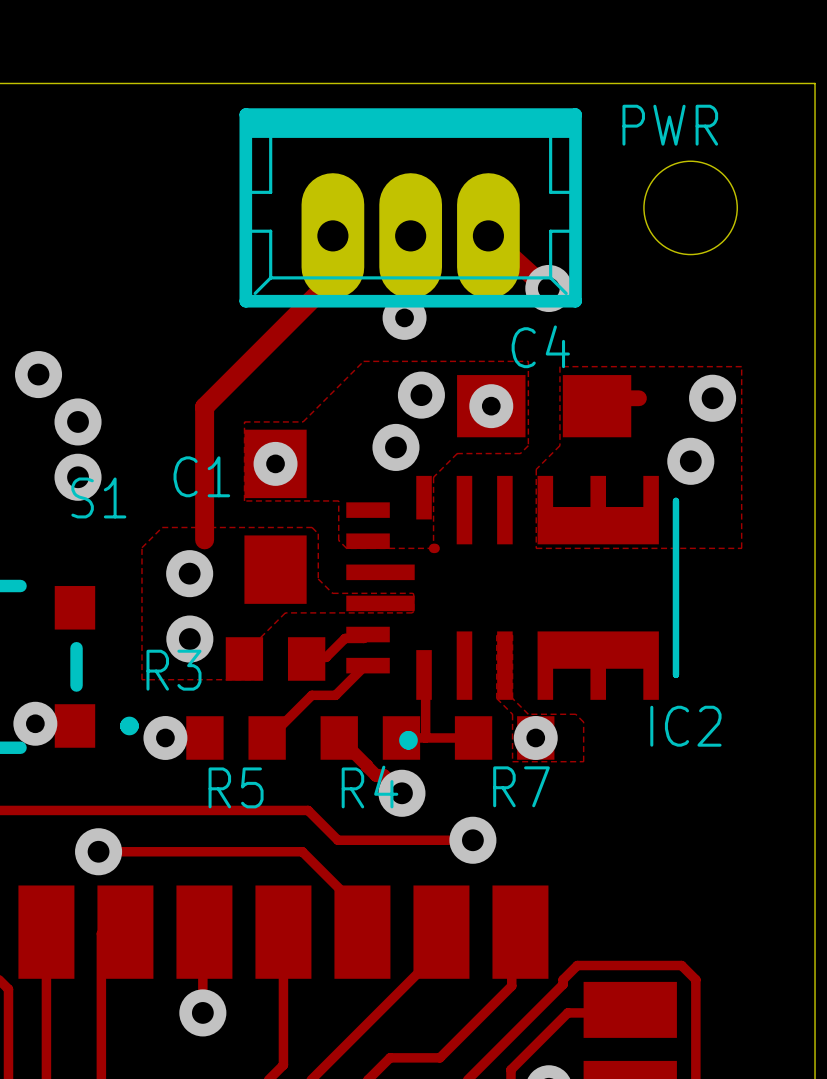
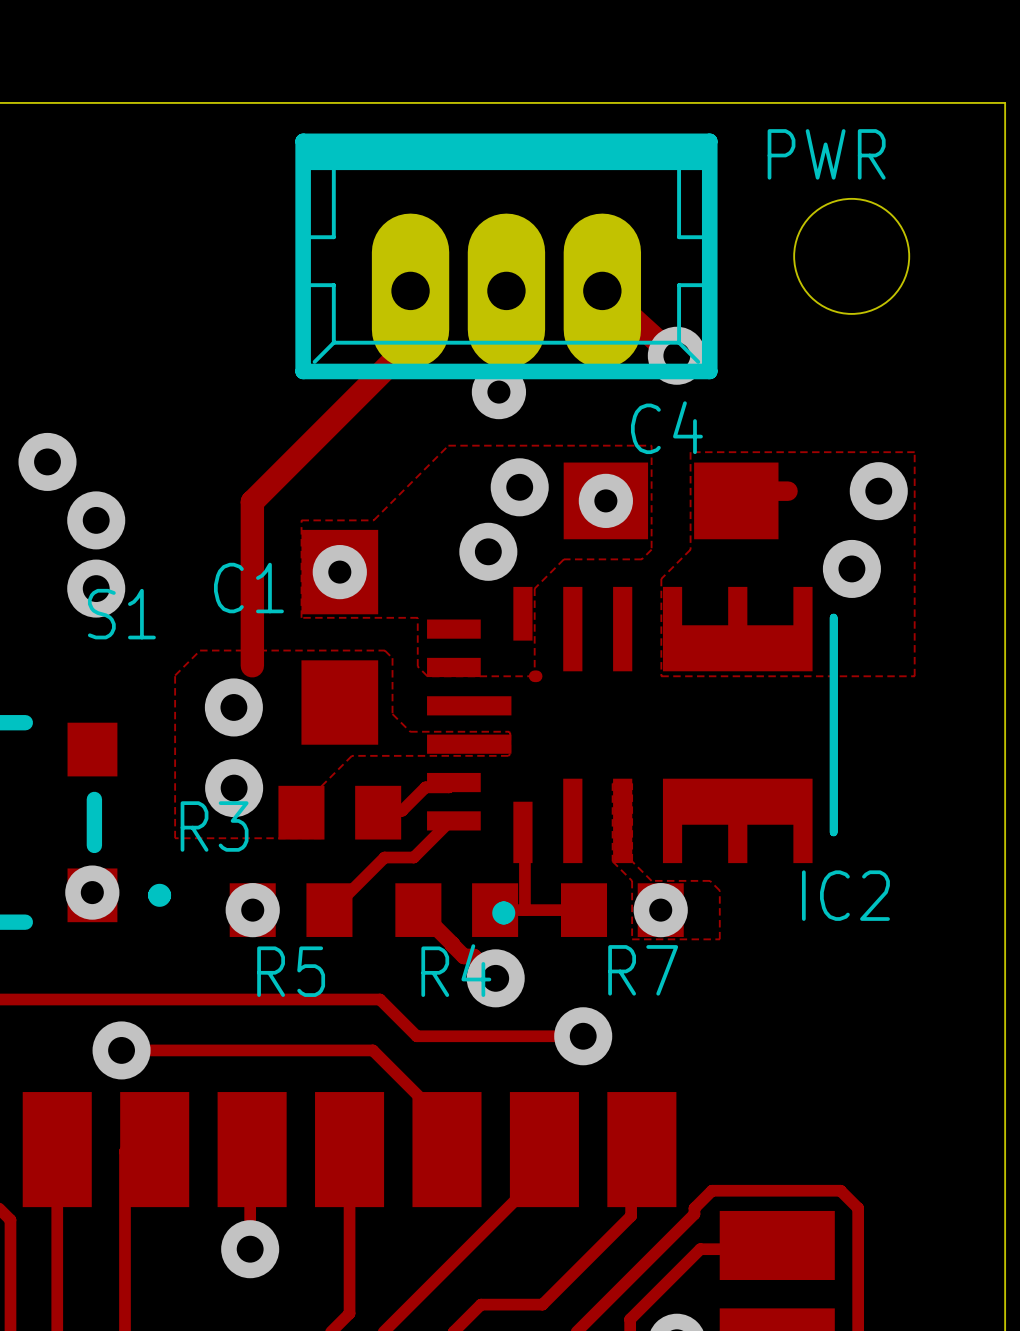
via position: (35, 723) -> (92, 892)
via position: (165, 737) -> (252, 910)

